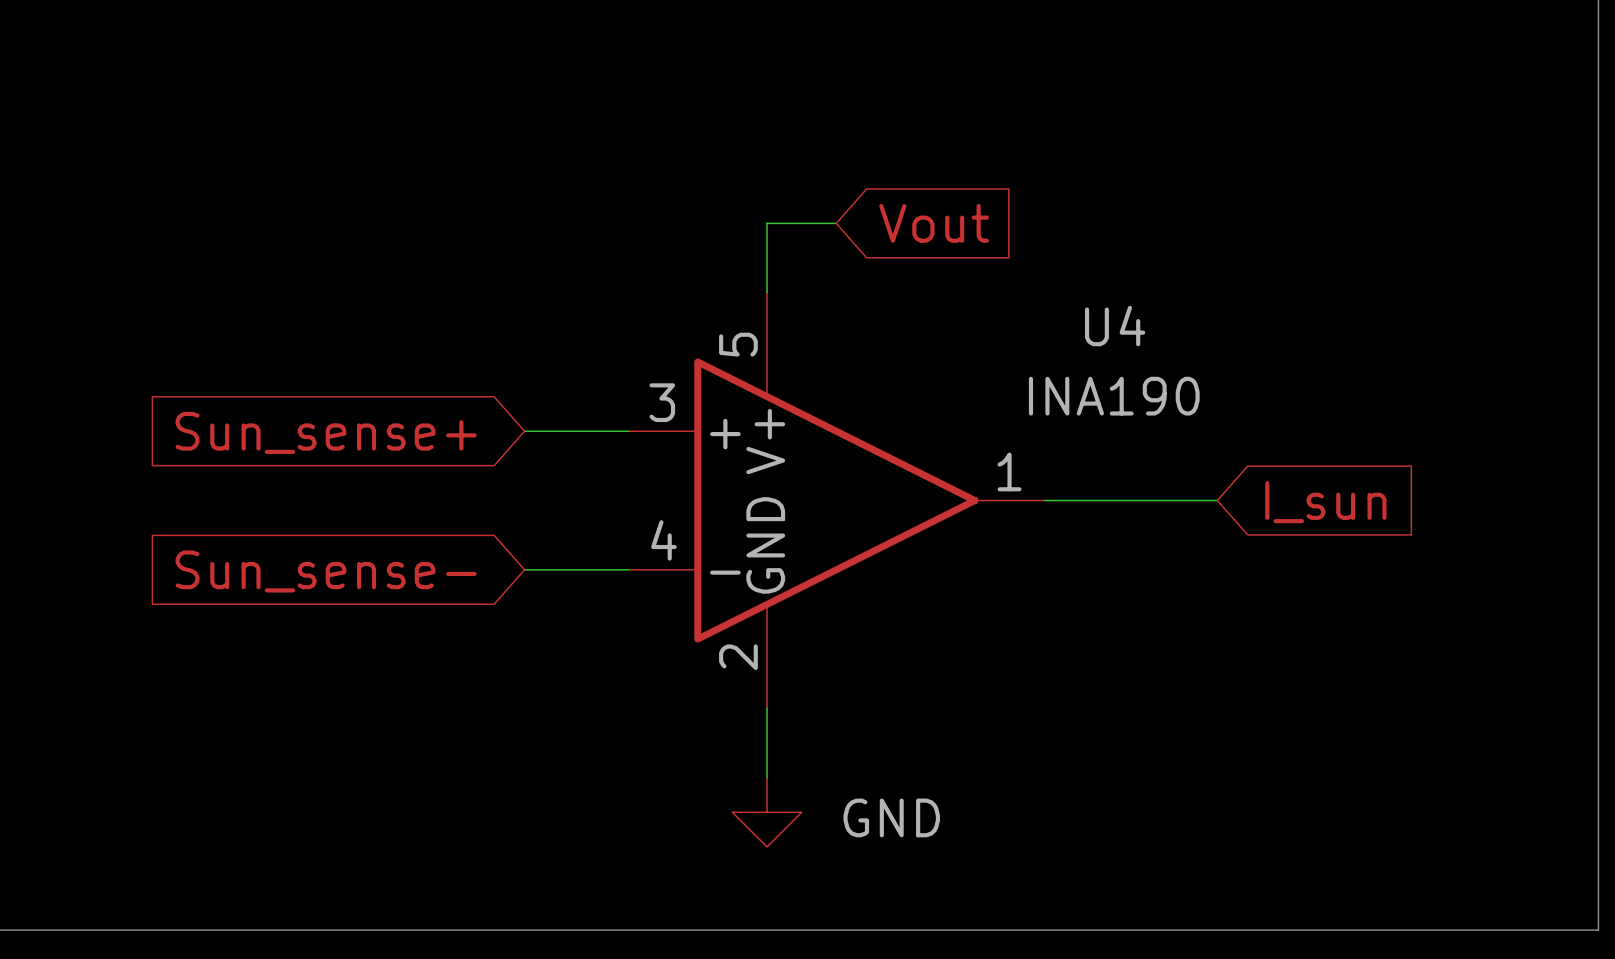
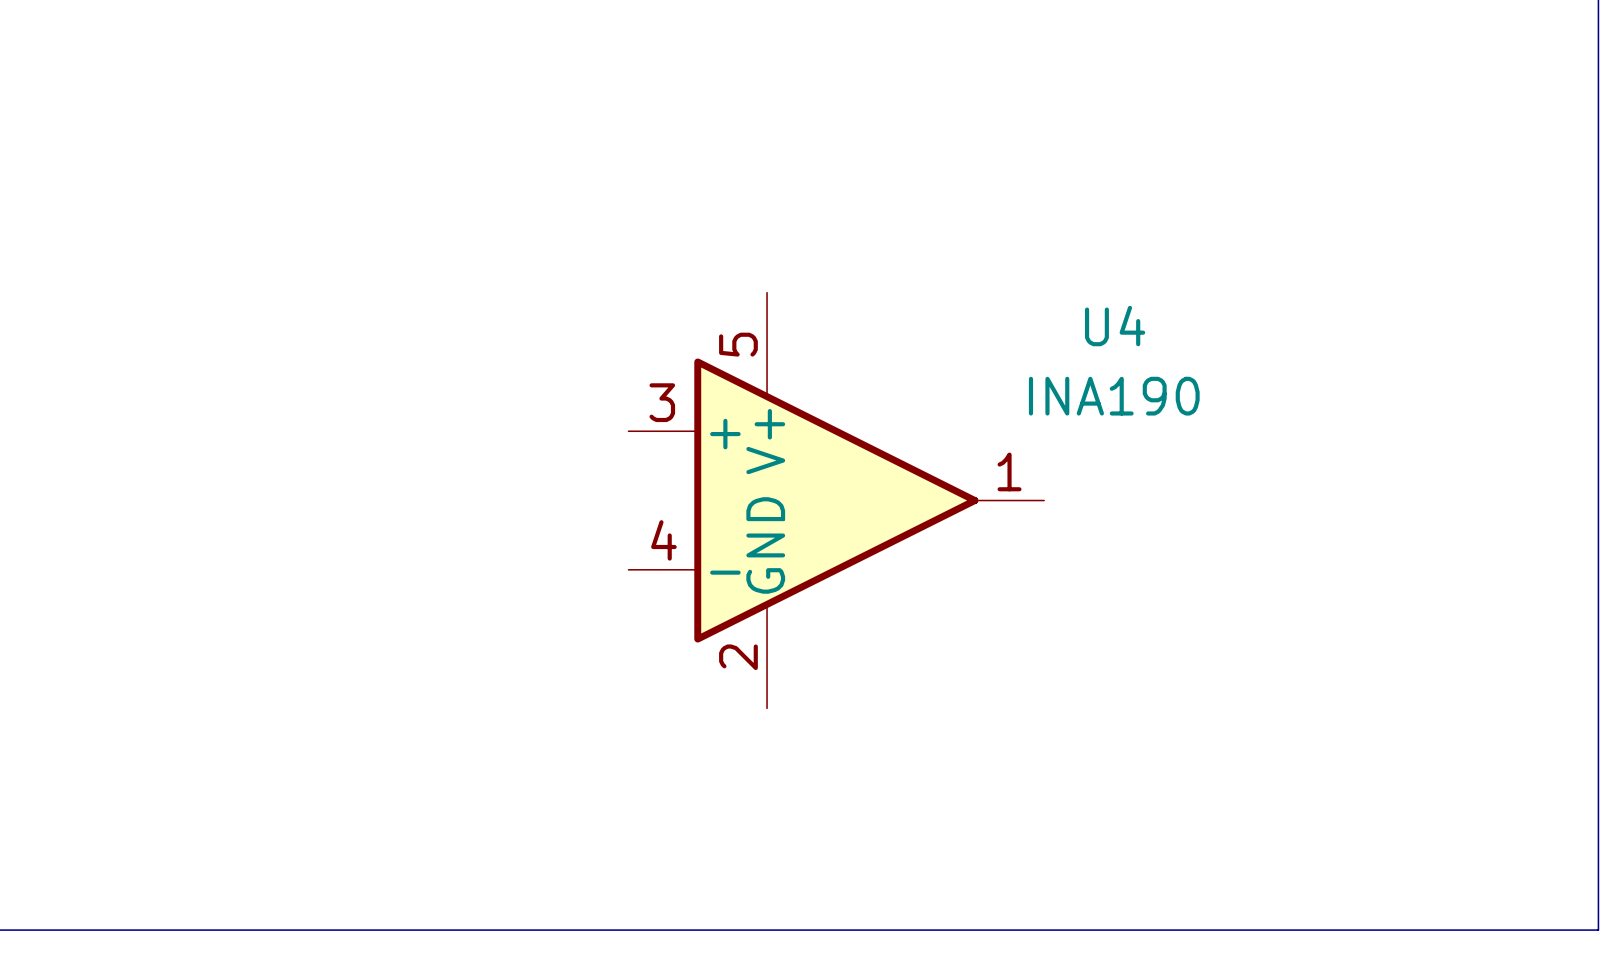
wire: (836, 223) (767, 223) (767, 292) -> none
global label: Vout (934, 223) -> none
wire: (524, 431) (628, 431) -> none
global label: Sun_sense+ (326, 432) -> none
wire: (1044, 500) (1217, 500) -> none
global label: I_sun (1325, 502) -> none
wire: (524, 569) (628, 569) -> none
global label: Sun_sense- (326, 571) -> none
wire: (767, 708) (767, 777) -> none
power symbol: GND (767, 812) -> none

